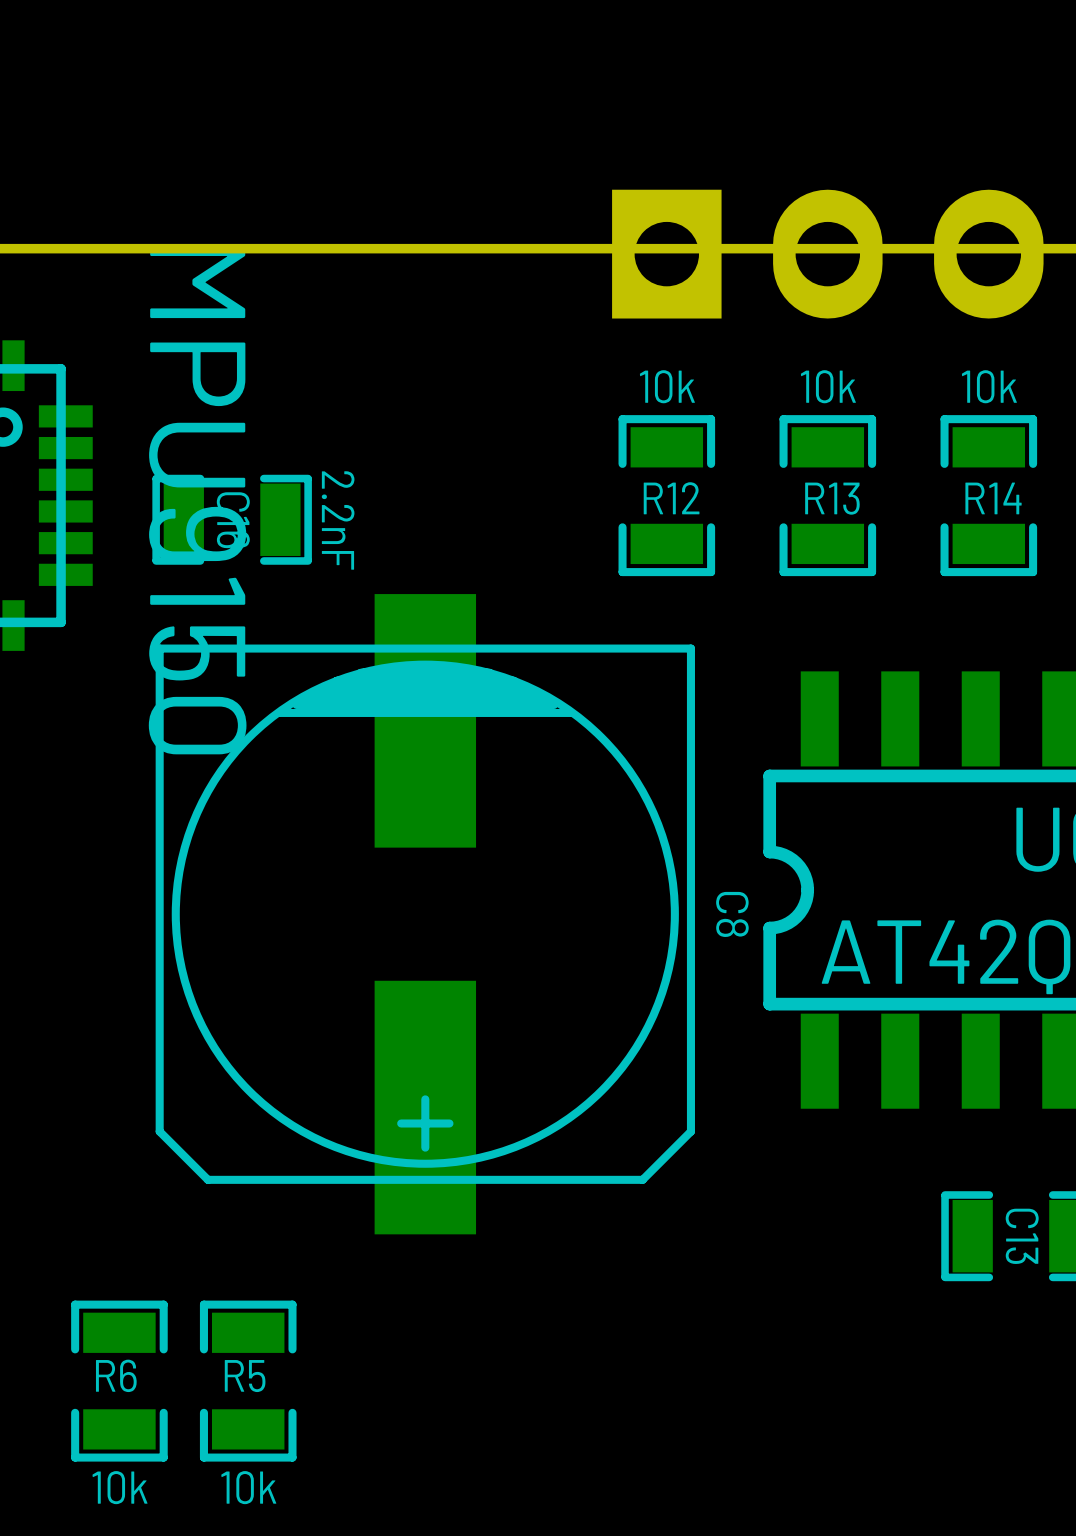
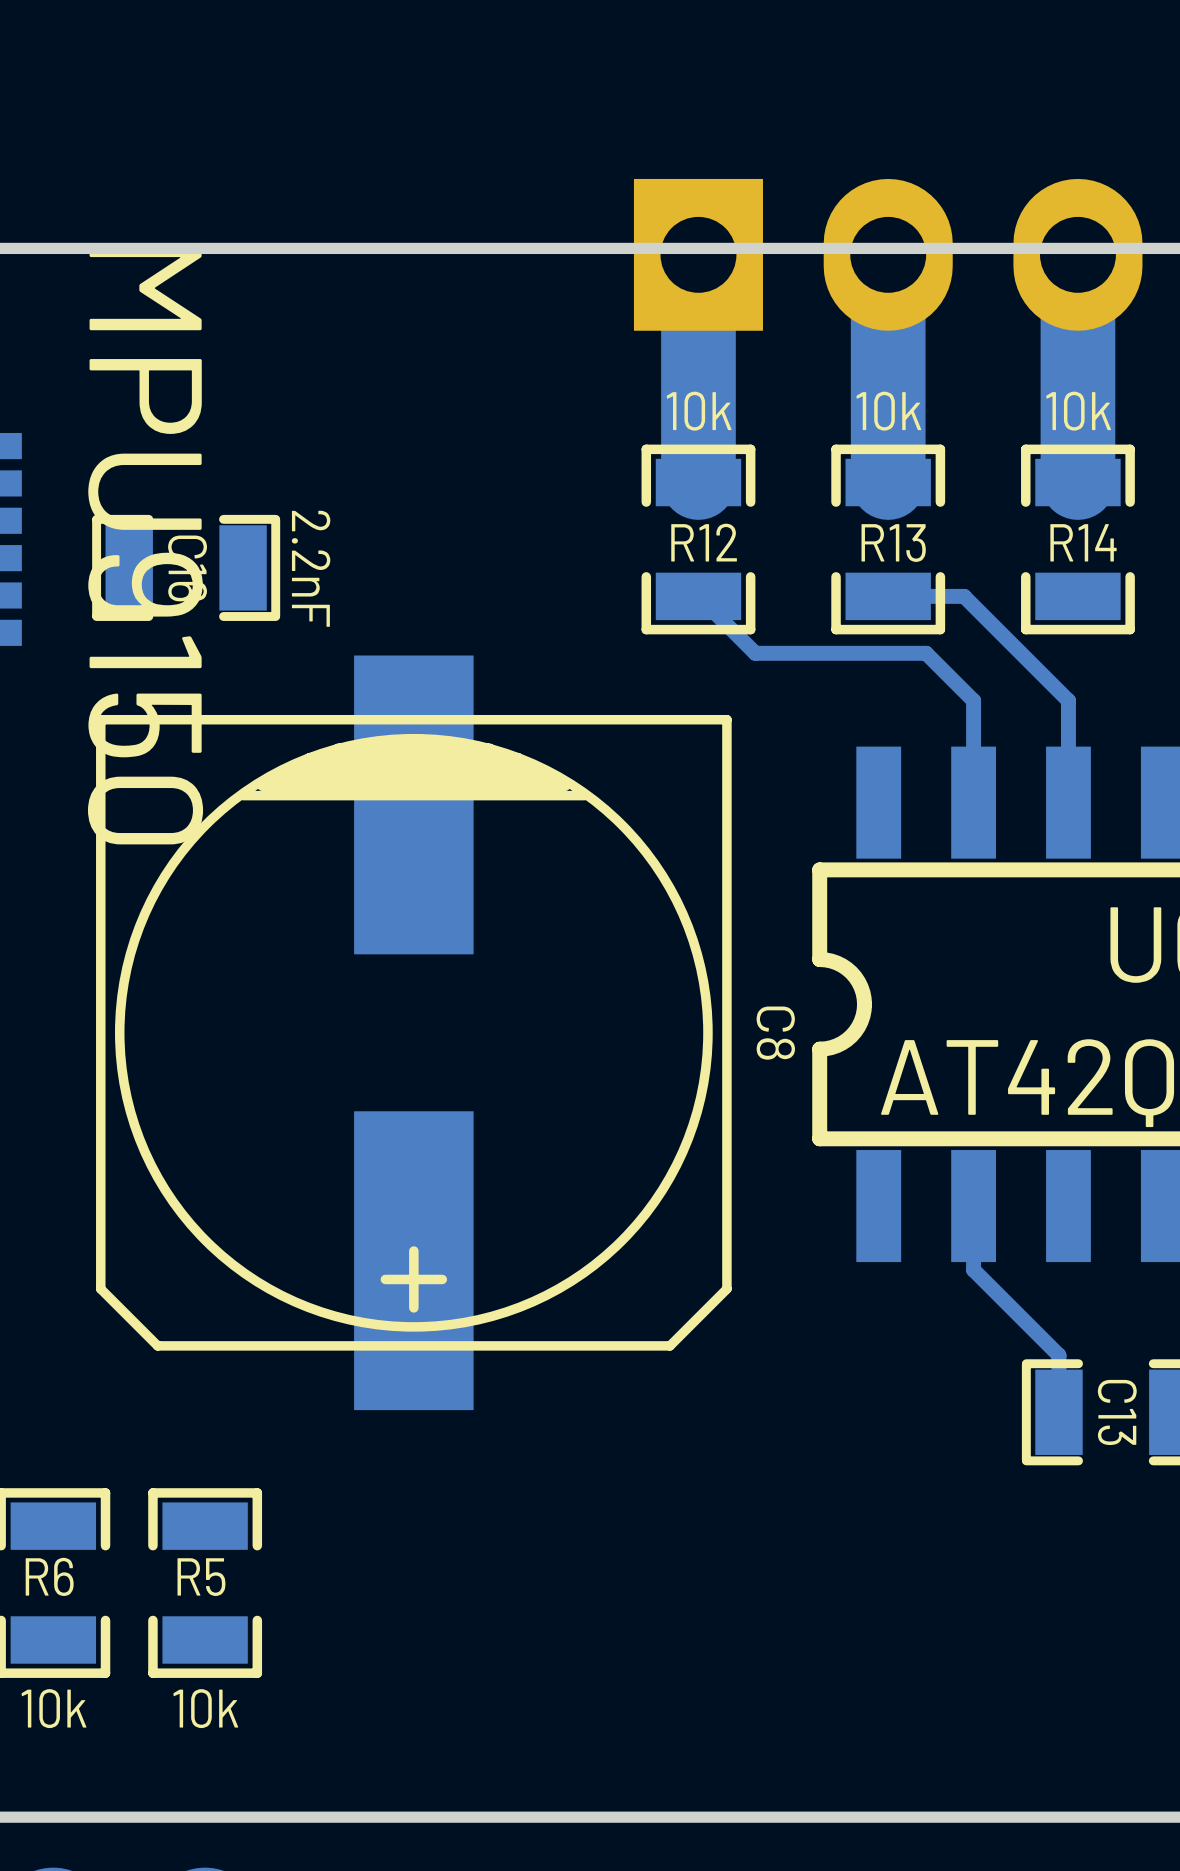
track: none -> (698, 254) (698, 482)
track: none -> (888, 254) (888, 482)
track: none -> (1077, 254) (1077, 482)
track: none -> (698, 596) (755, 653) (926, 653) (973, 700) (973, 802)
track: none -> (888, 596) (964, 596) (1068, 700) (1068, 802)
track: none -> (973, 1206) (973, 1269) (1058, 1355) (1058, 1412)

